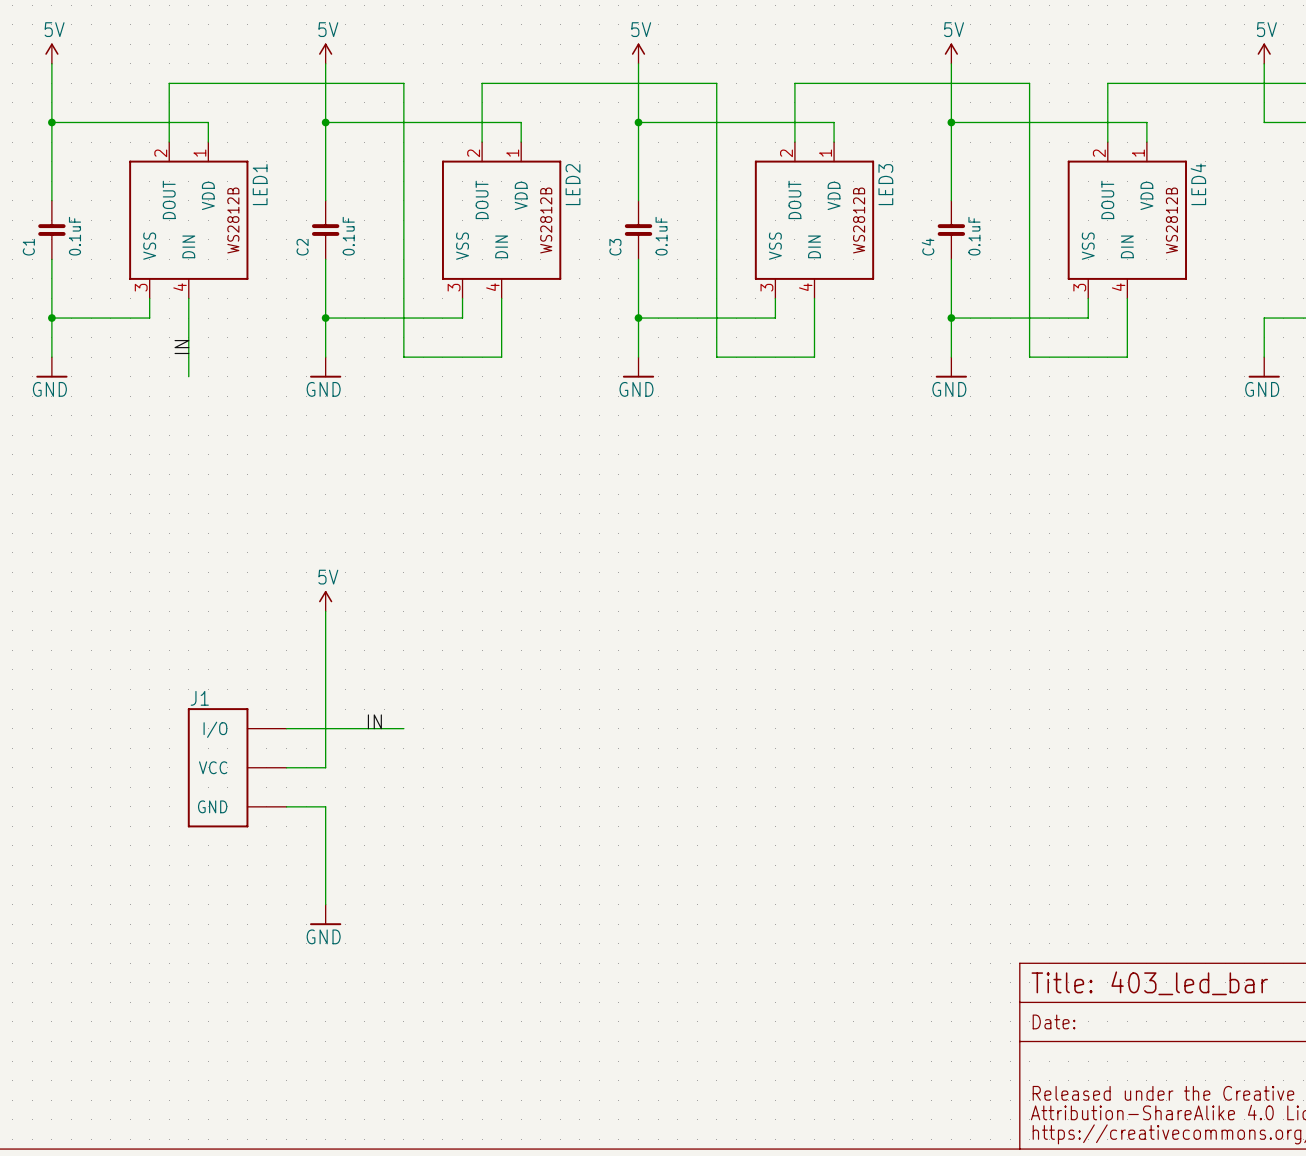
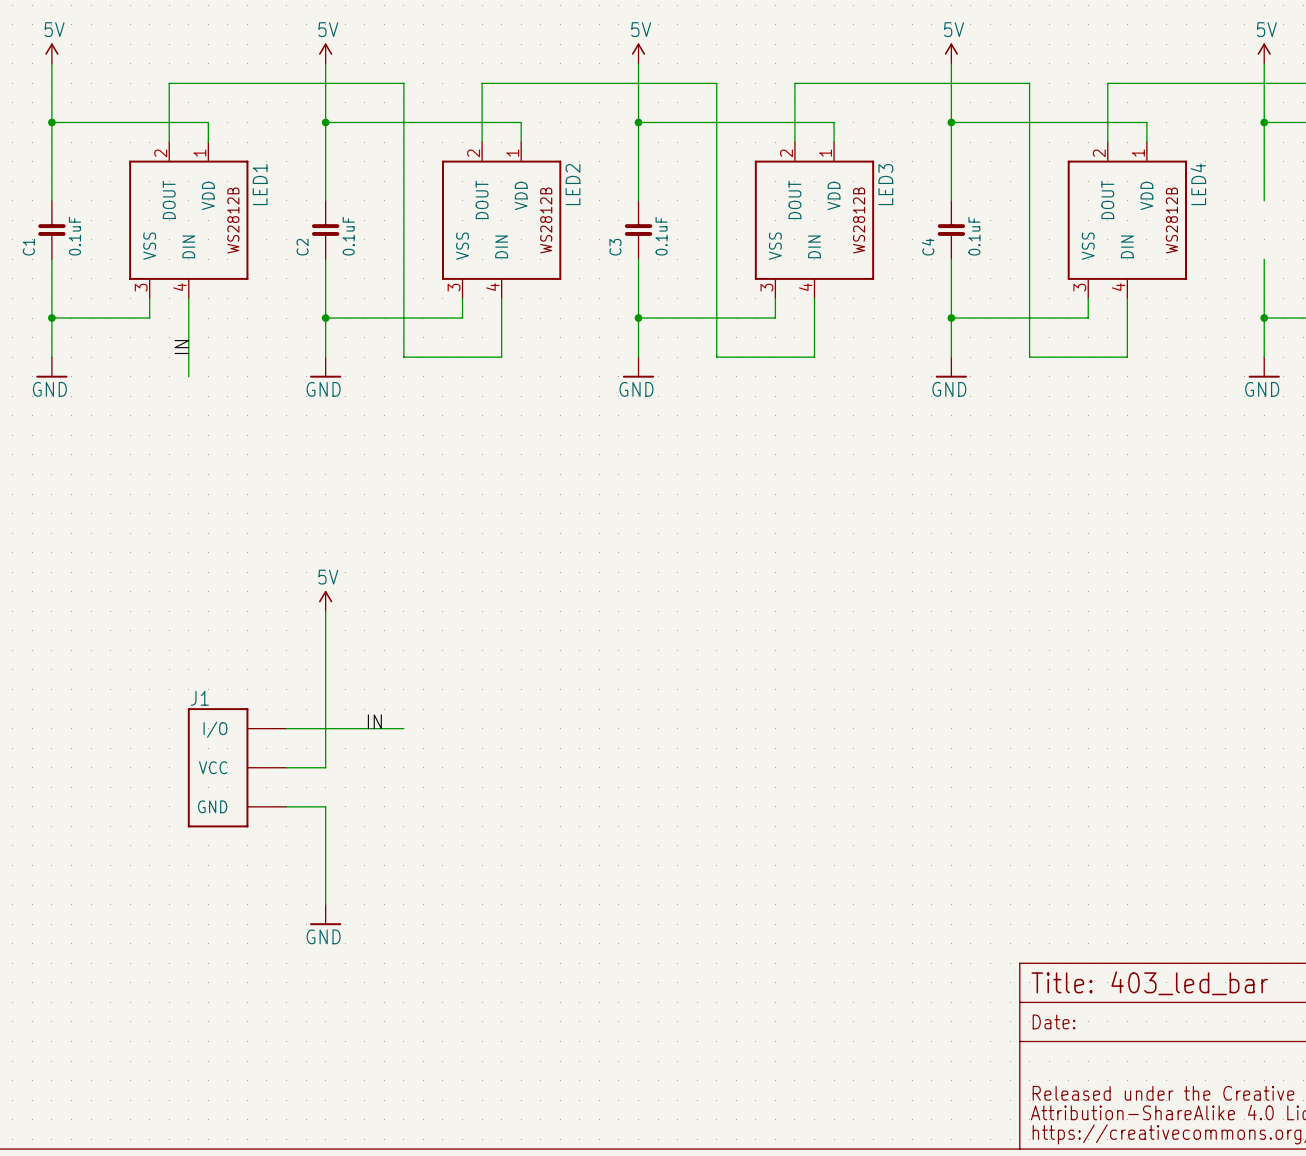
wire: none -> (1264, 122) (1264, 200)
junction: none -> (1264, 122)
wire: none -> (1264, 259) (1264, 318)
junction: none -> (1264, 318)

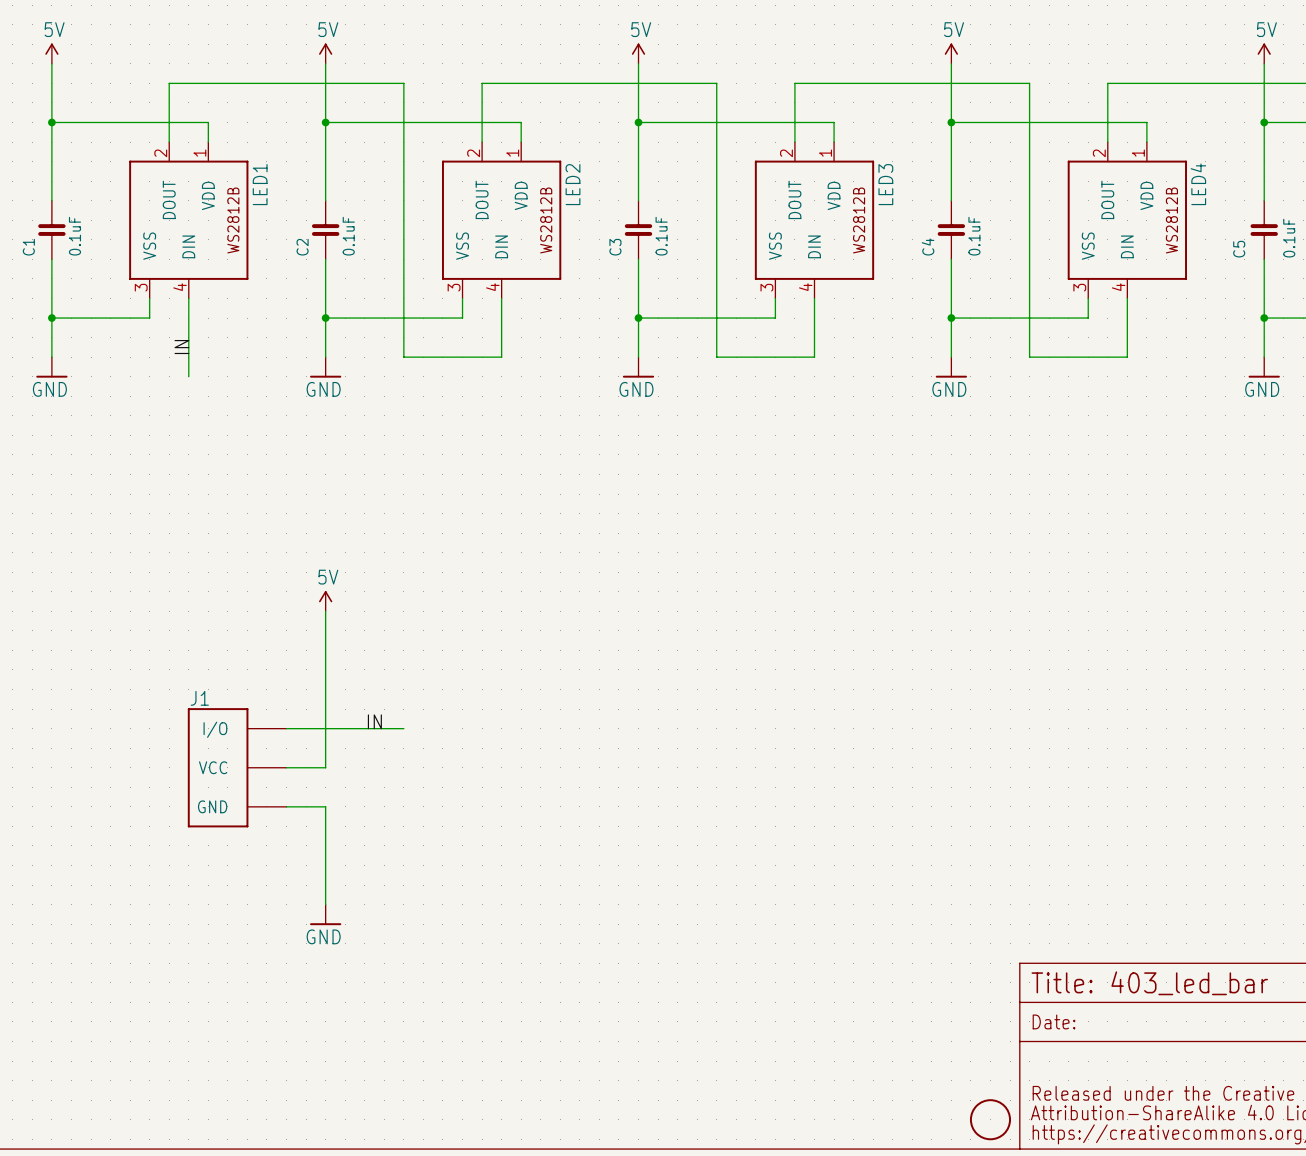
C5: none -> 0.1uF (1264, 230)
part: none -> (990, 1119)

